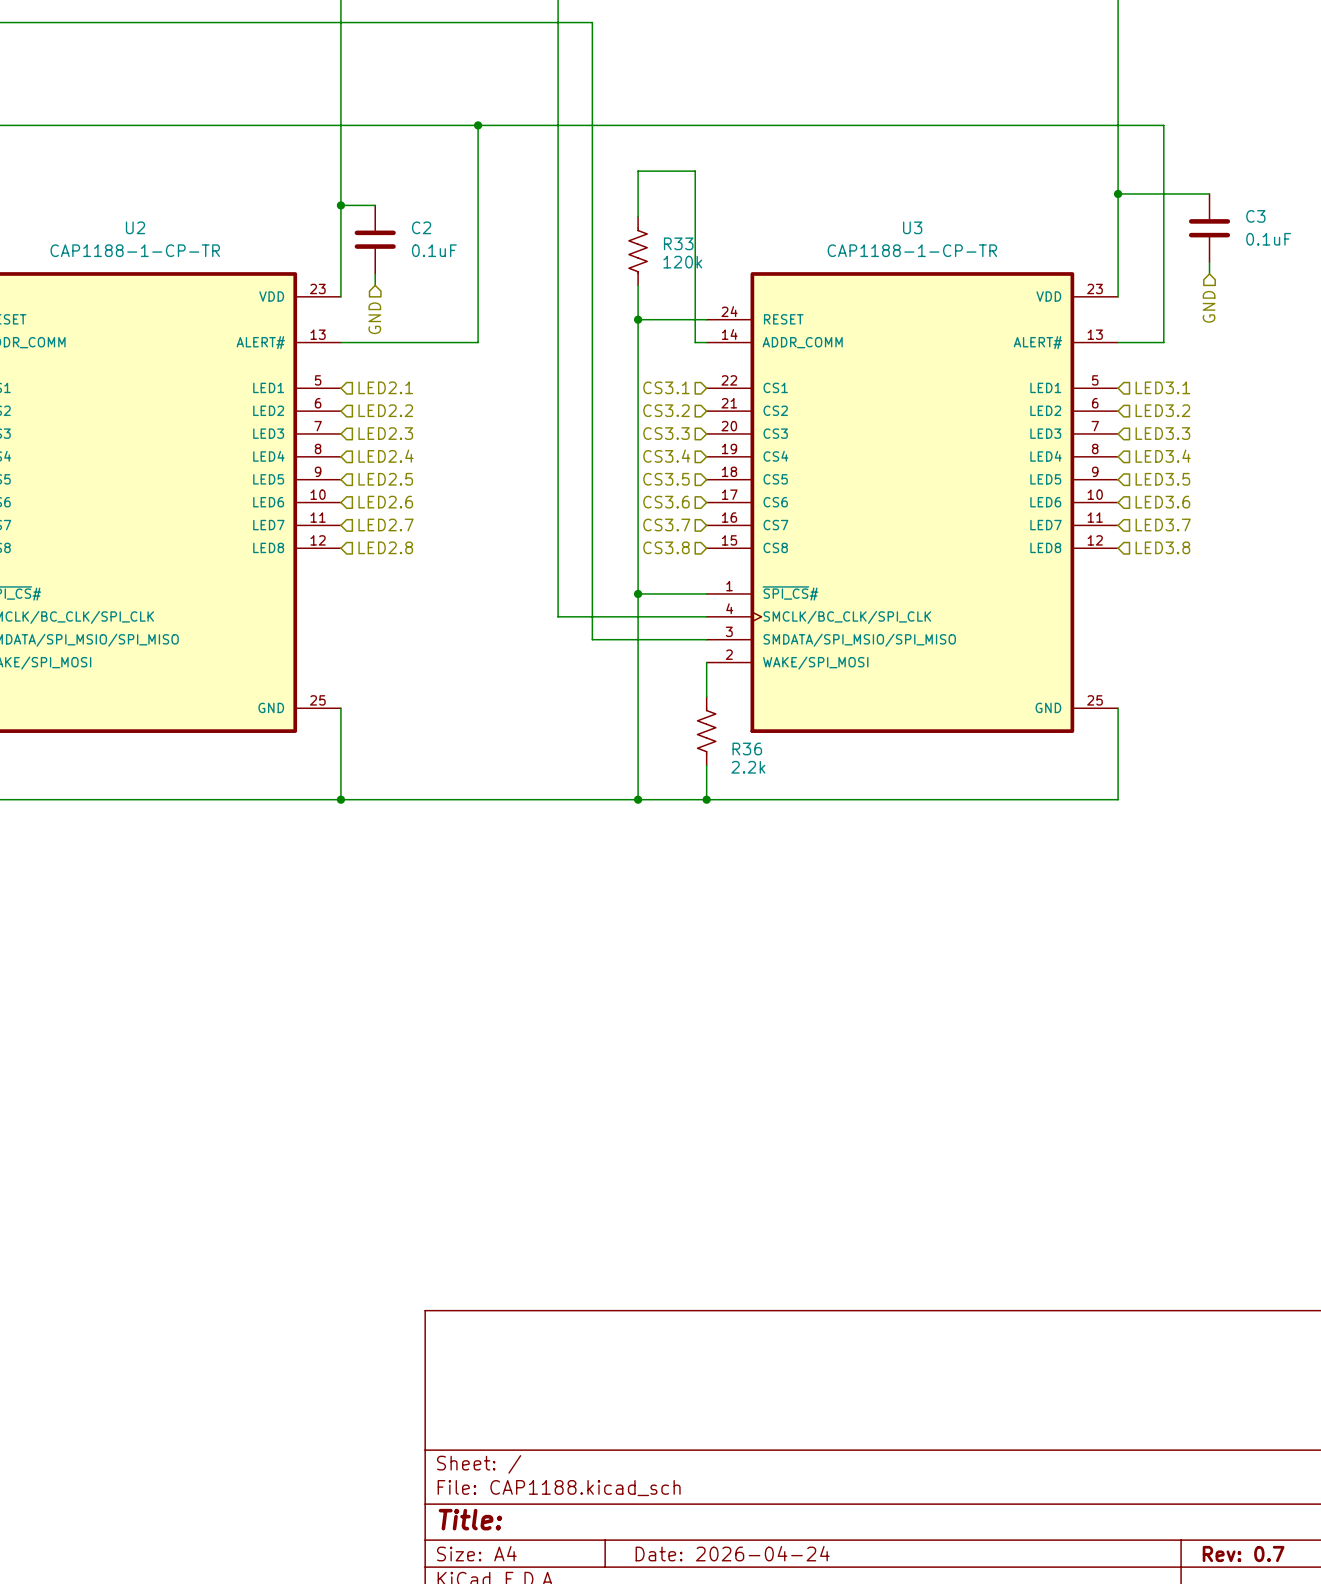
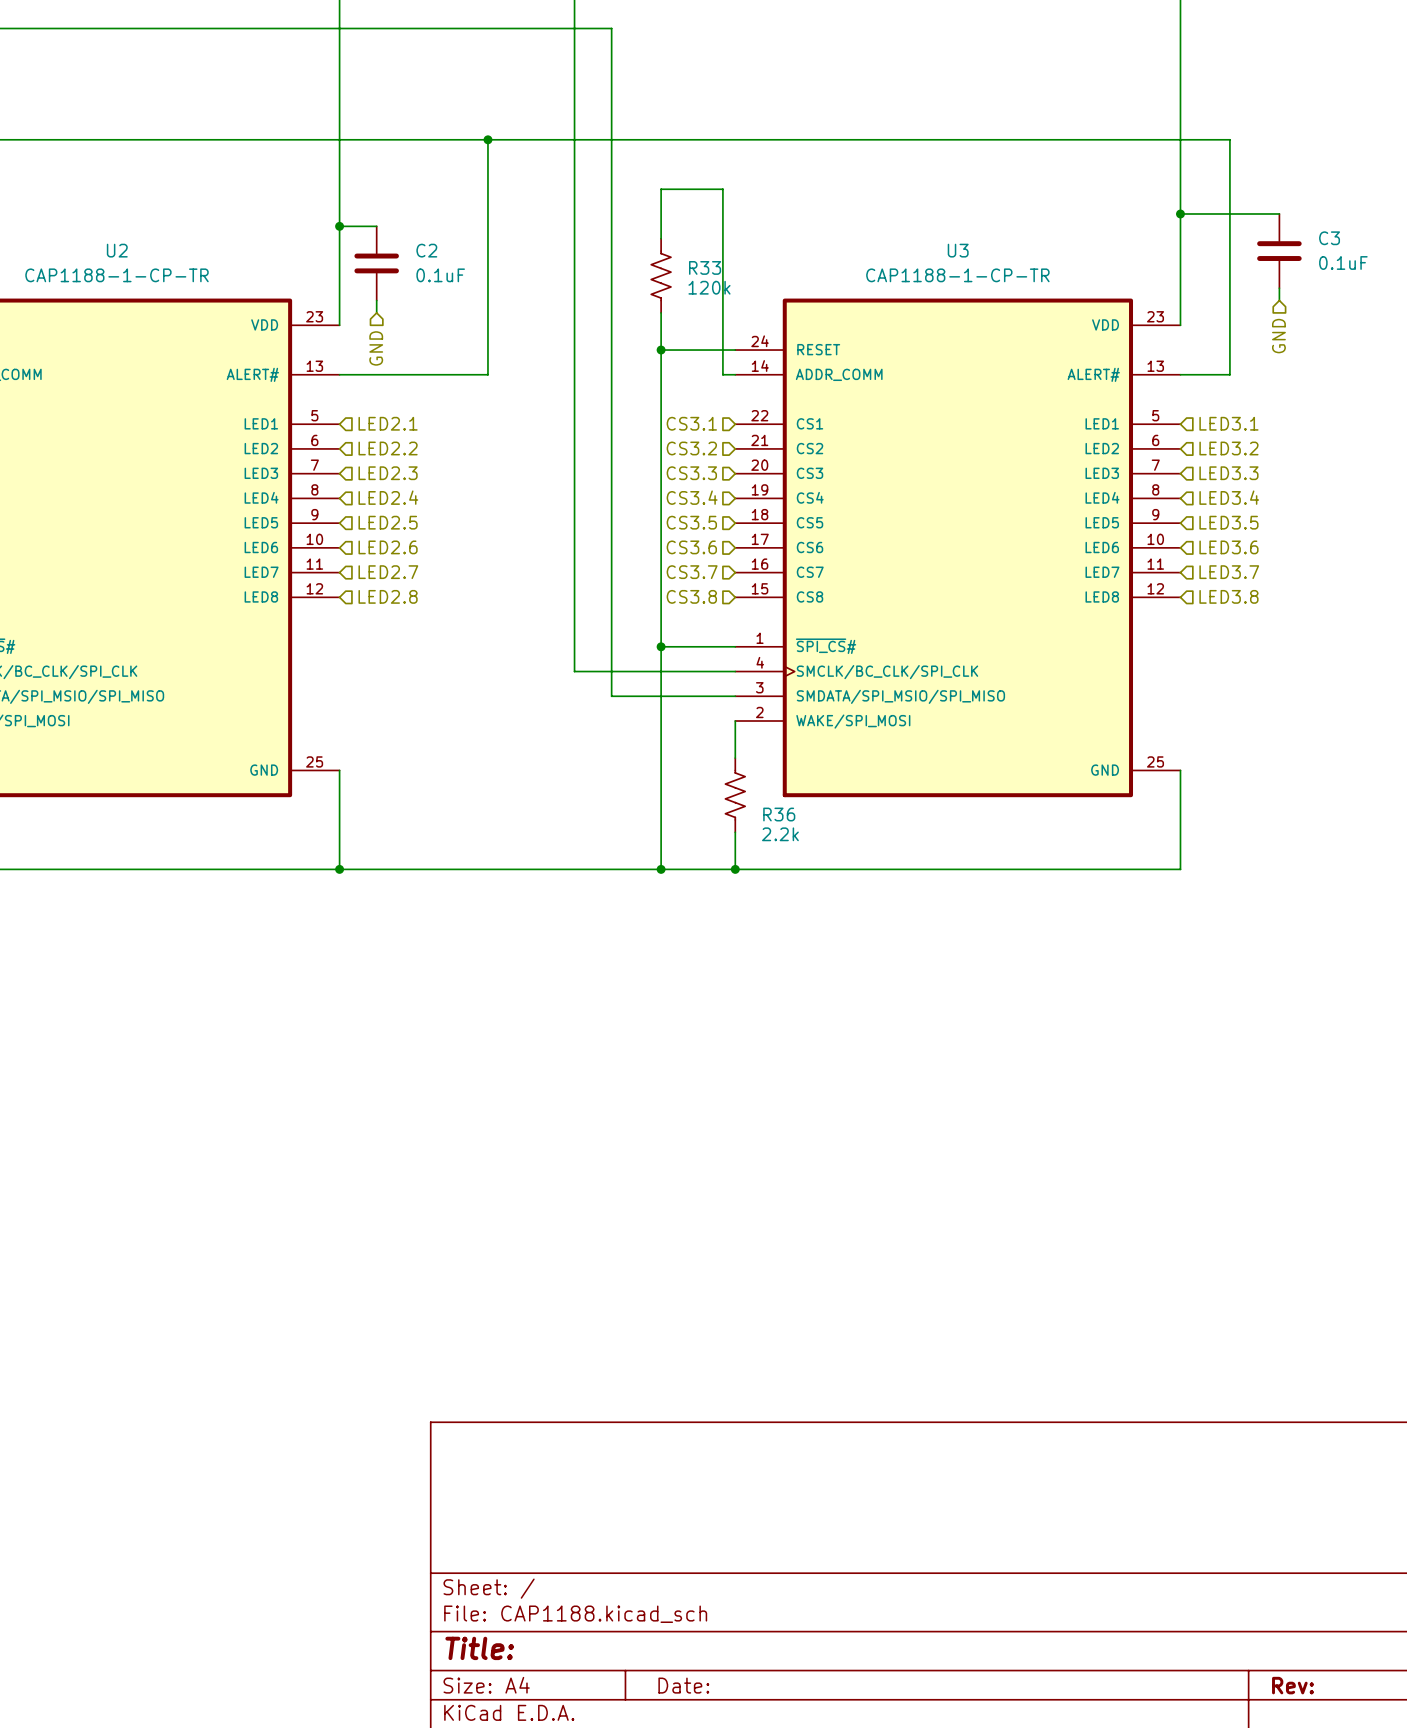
title block: Date: 2026-04-24 (732, 1553) -> Date: (683, 1685)
title block: Rev: 0.7 (1243, 1554) -> Rev: (1292, 1685)

